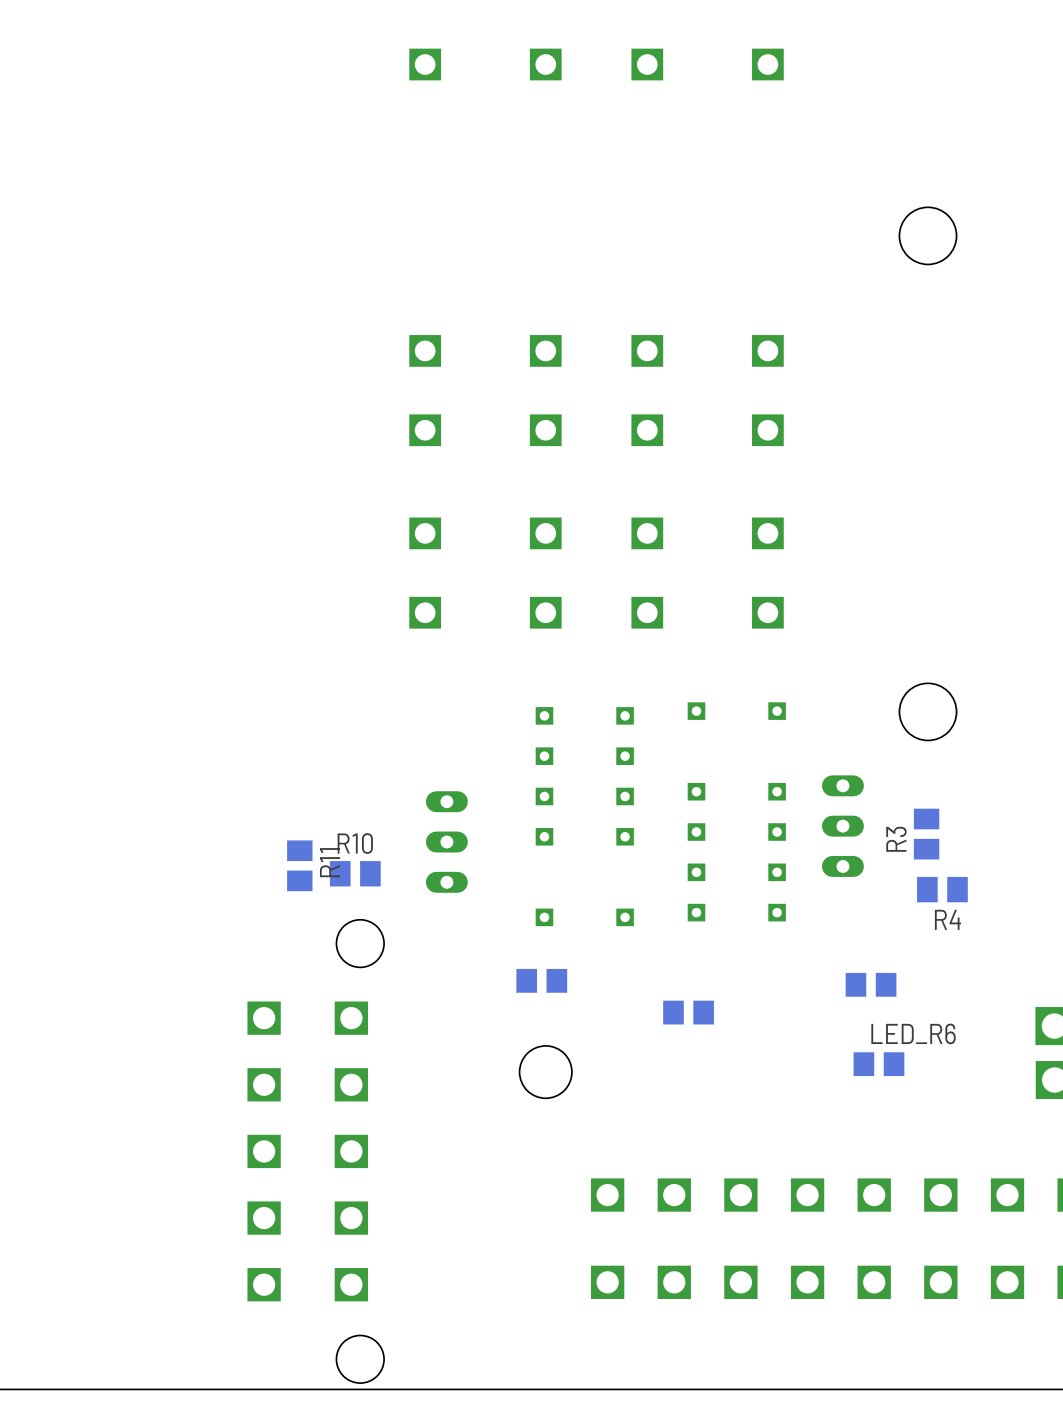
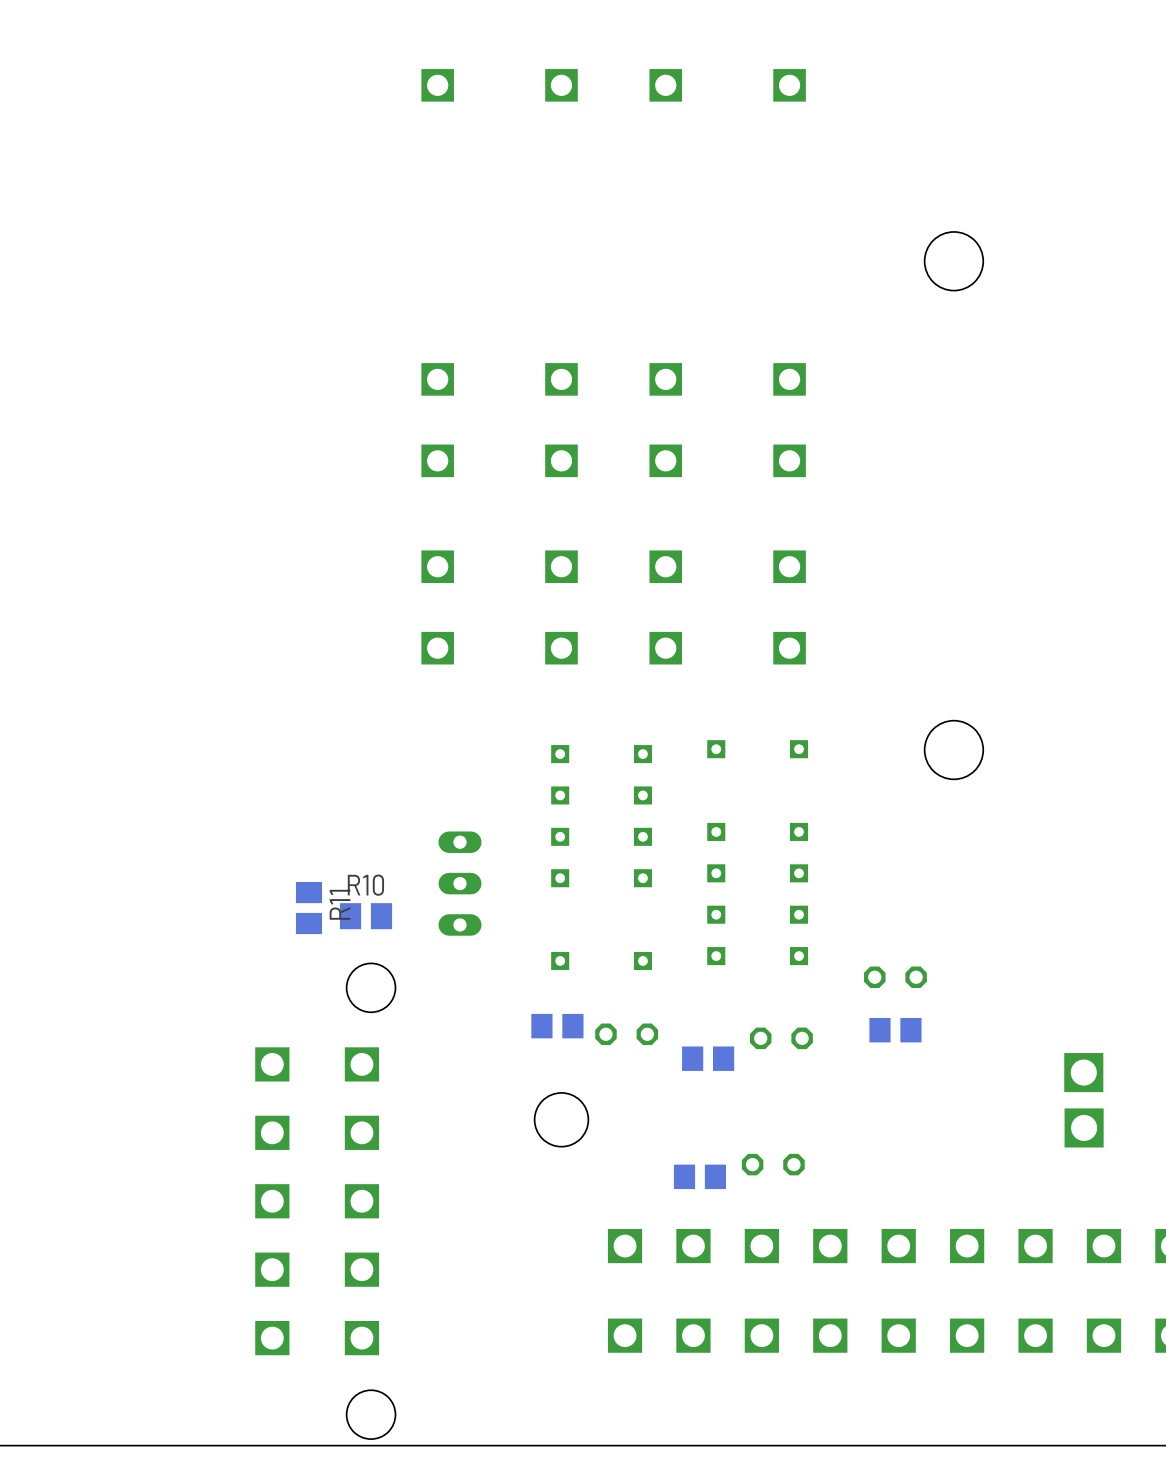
part: (842, 826) -> none
R3: (926, 834) -> none
R4: (942, 889) -> none
part: none -> (895, 977)
part: none -> (626, 1034)
part: none -> (781, 1038)
LED_R6: (878, 1064) -> none
part: none -> (773, 1164)
part: none -> (699, 1176)

